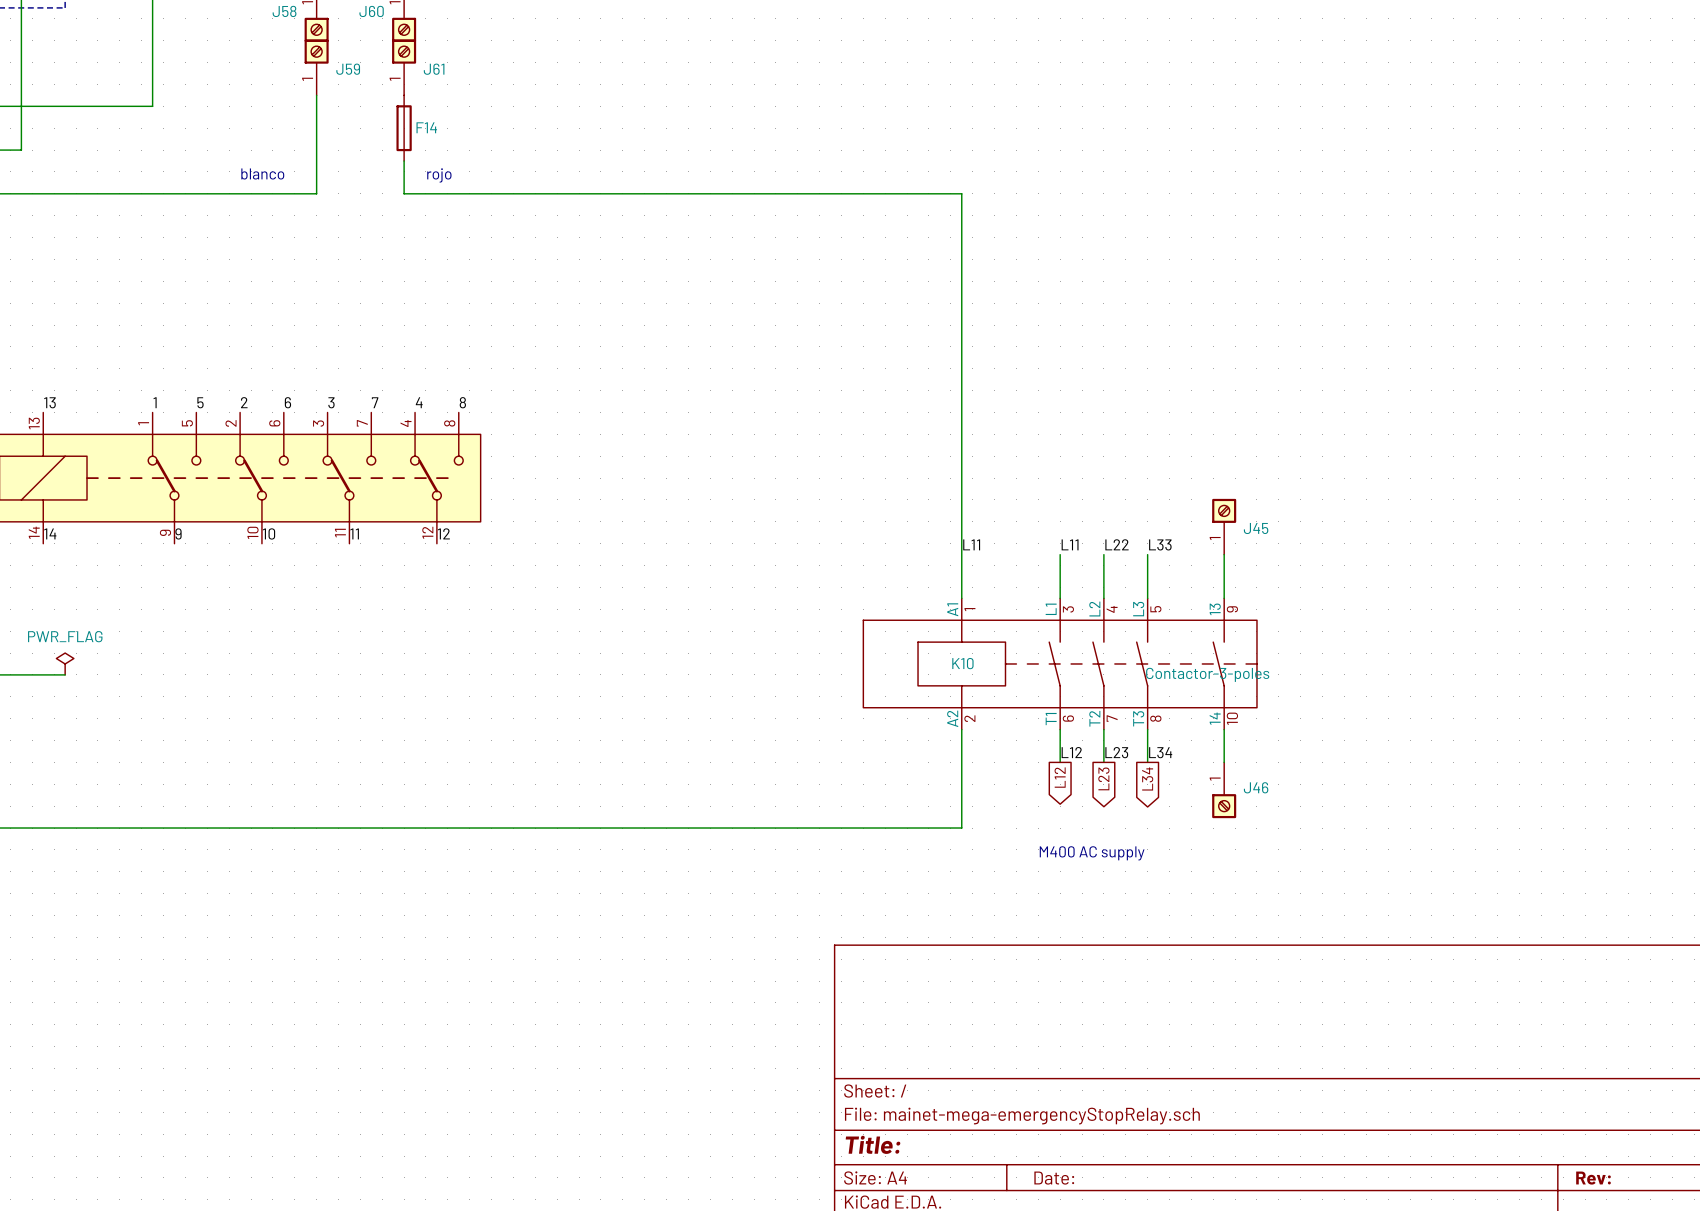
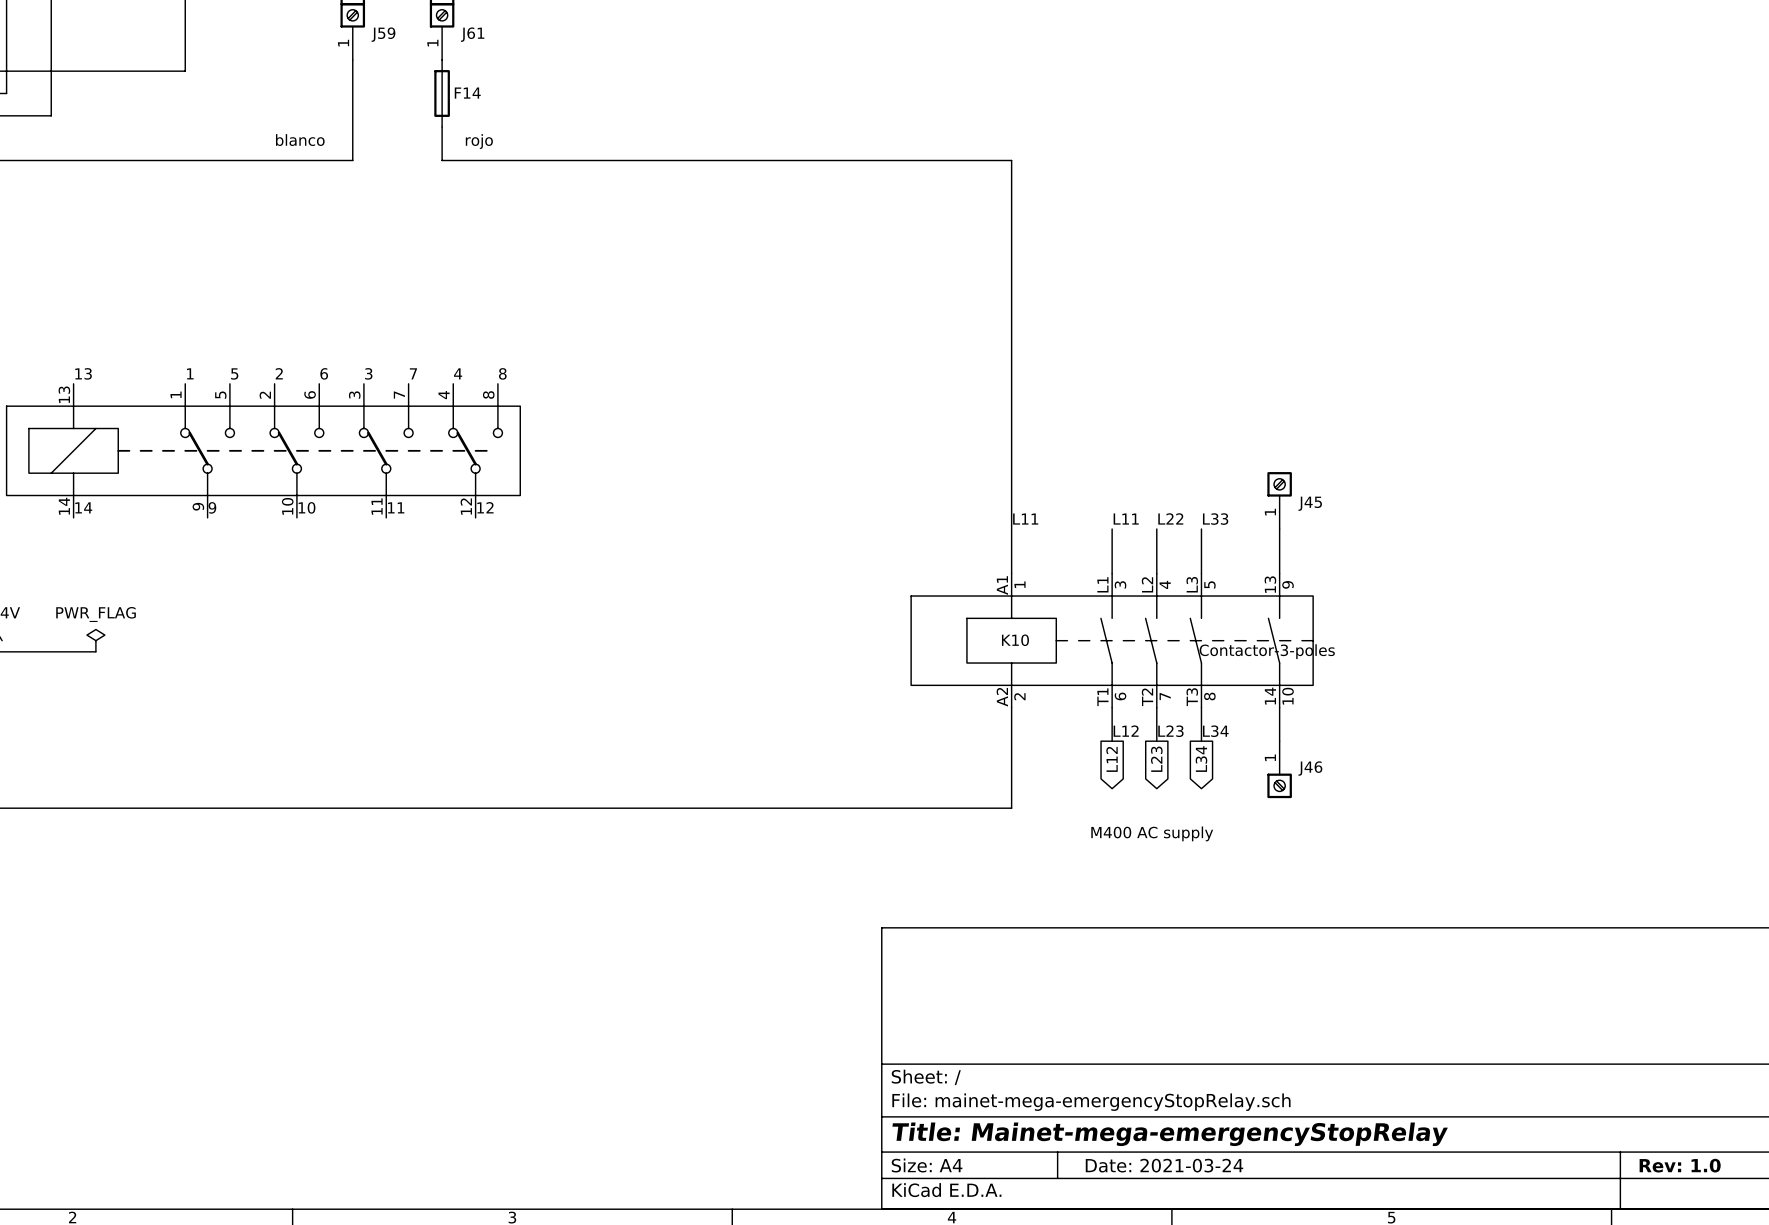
title block: Title: (873, 1144) -> Title: Mainet-mega-emergencyStopRelay (1170, 1134)
title block: Date: (1054, 1178) -> Date: 2021-03-24 (1164, 1165)
title block: Rev: (1593, 1178) -> Rev: 1.0 (1680, 1165)

